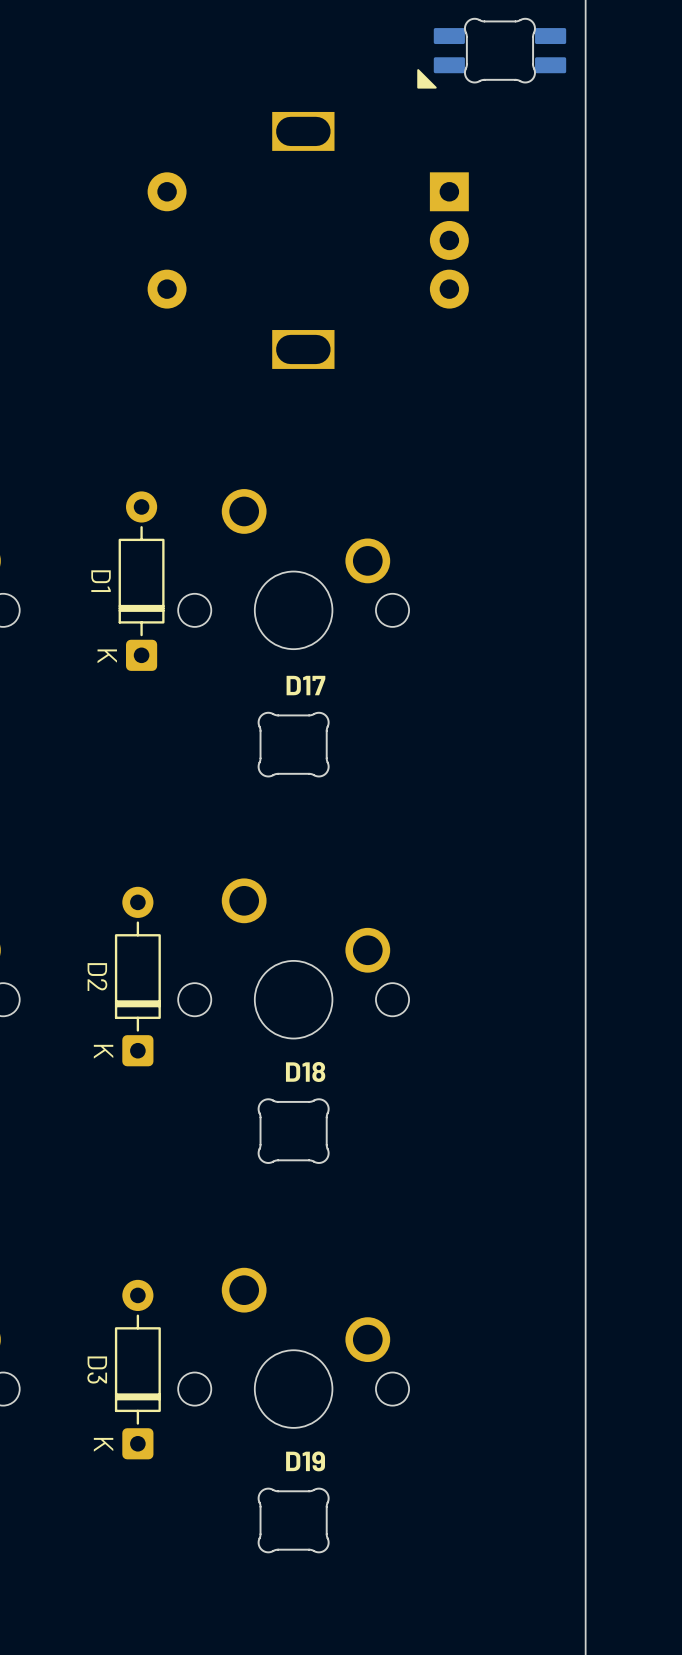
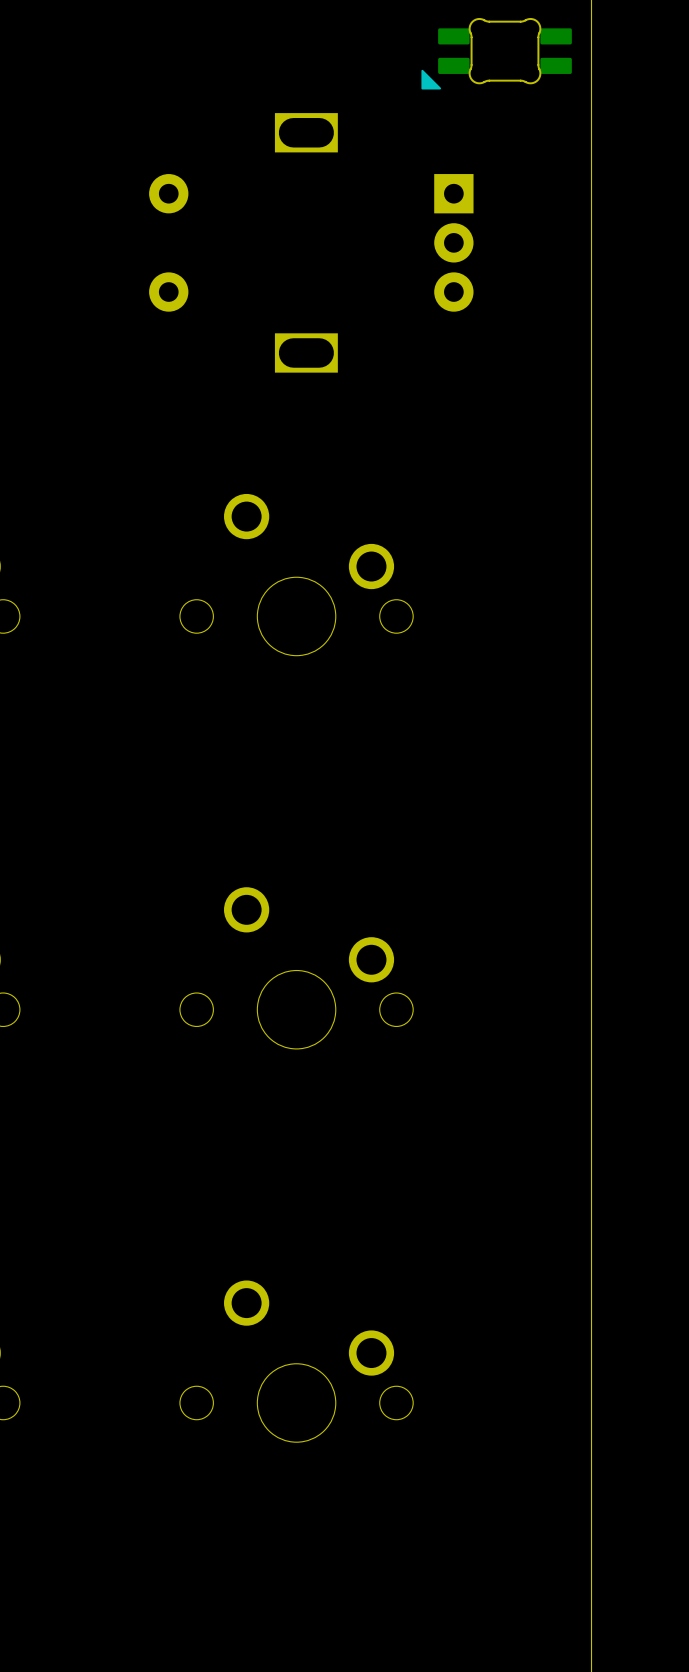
D1: (141, 581) -> none
D17: (293, 744) -> none
D2: (137, 976) -> none
D18: (293, 1131) -> none
D3: (137, 1369) -> none
D19: (293, 1520) -> none

